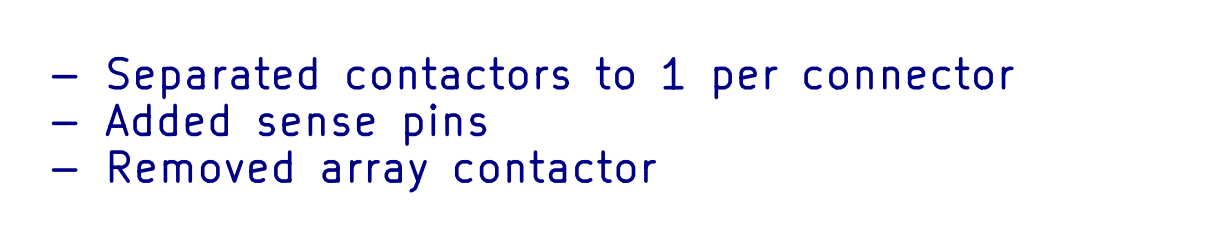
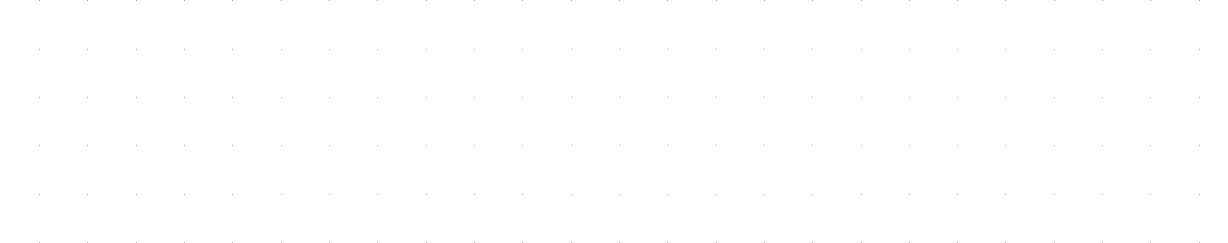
text: - Separated contactors to 1 per connector (532, 78) -> none
text: - Added sense pins (268, 124) -> none
text: - Removed array contactor (353, 171) -> none

